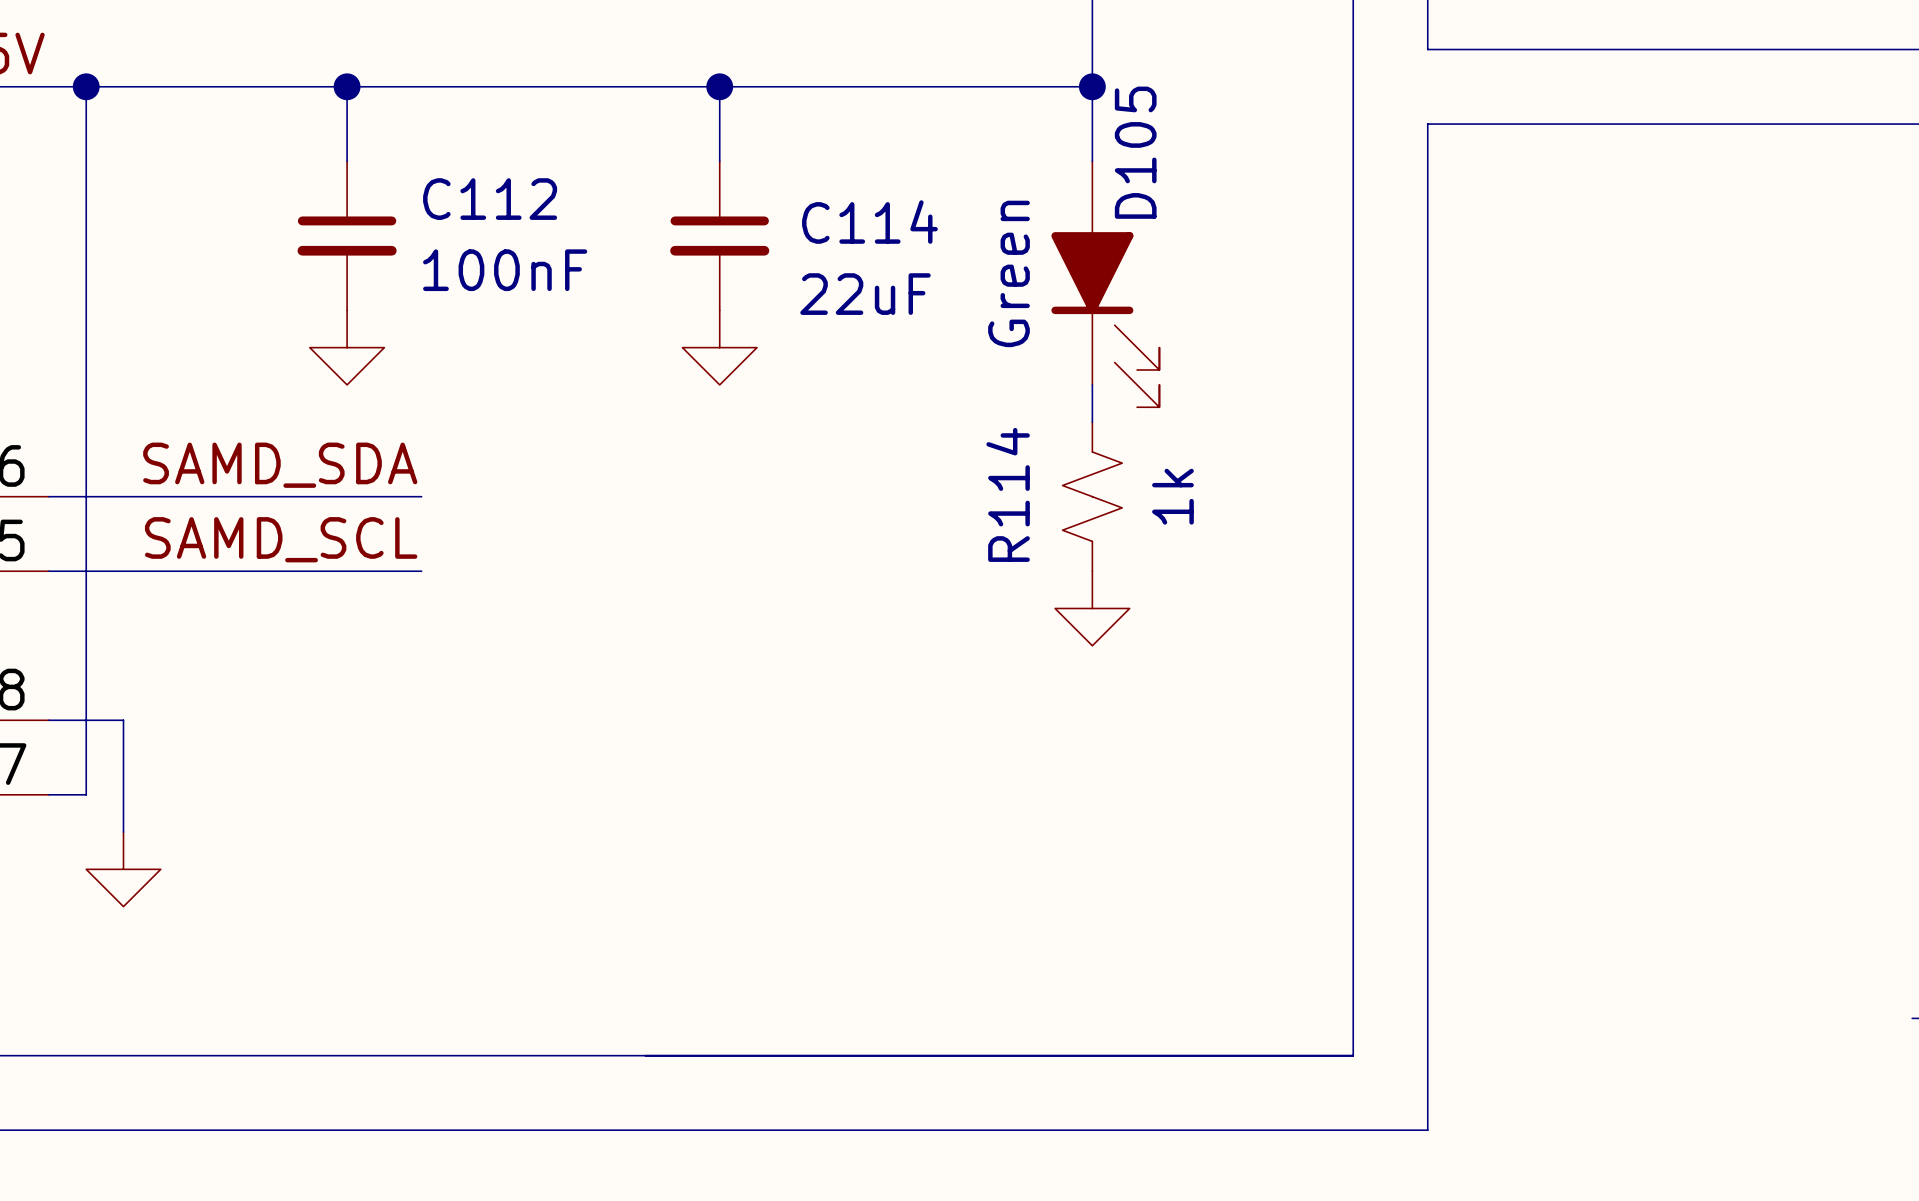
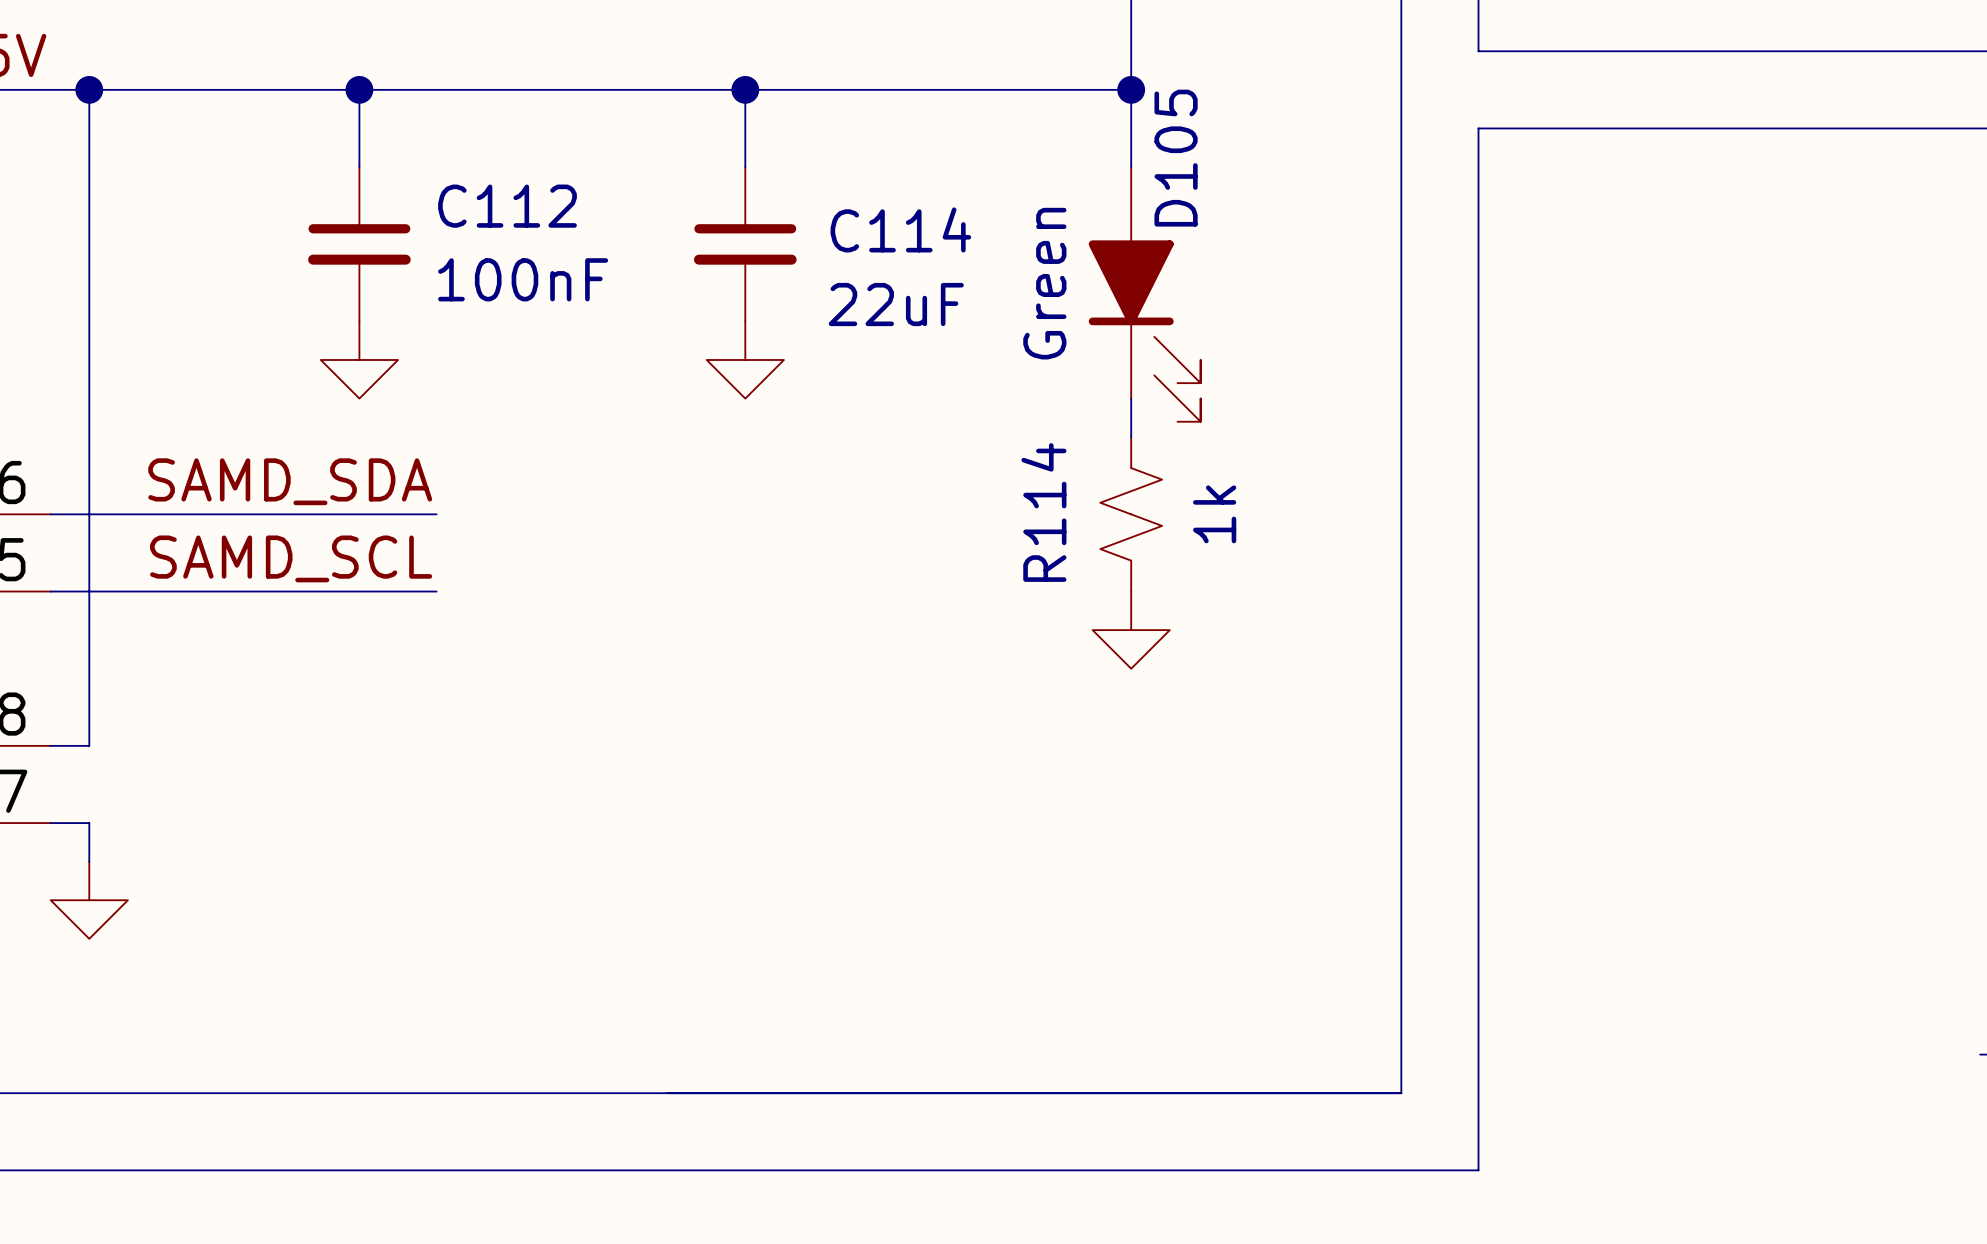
wire: (86, 794) (86, 720) (123, 720) (123, 832) -> (89, 823) (89, 861)
power symbol position: (123, 869) -> (89, 900)

